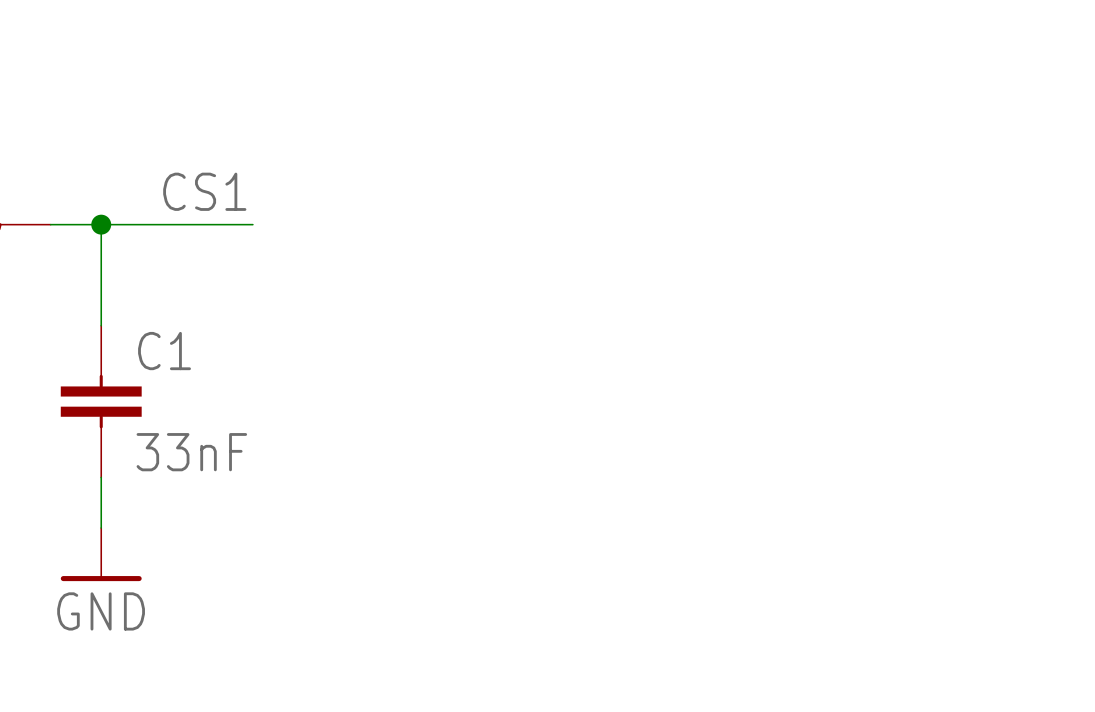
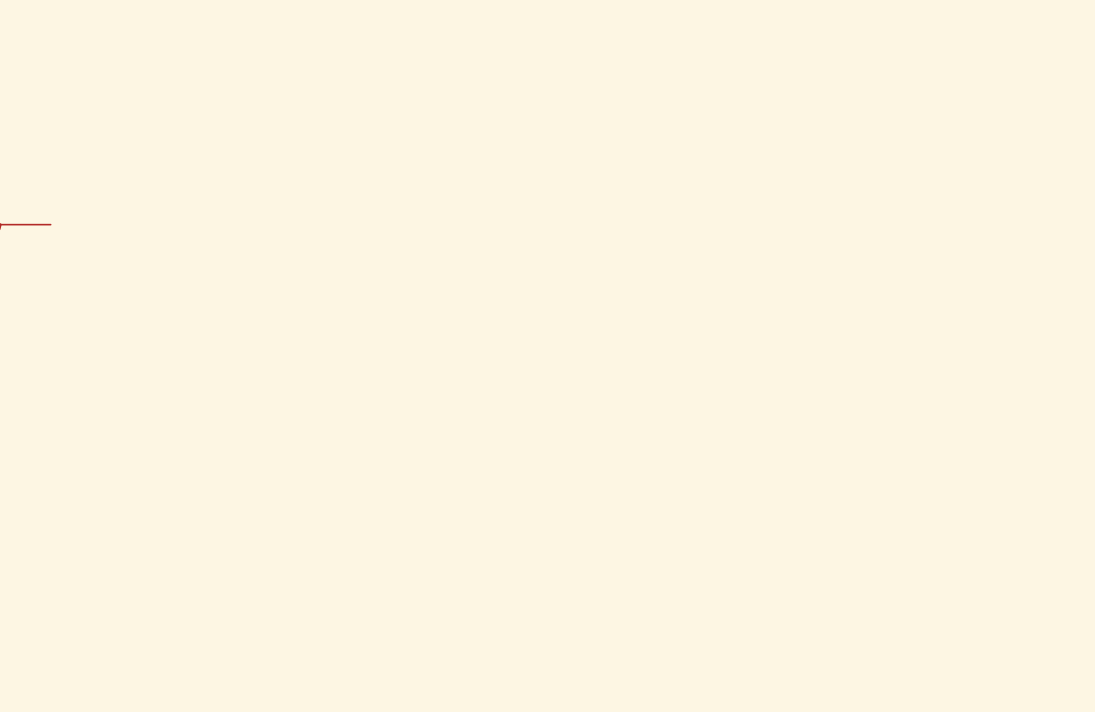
label: CS1 (204, 191) -> none
wire: (50, 224) (252, 224) -> none
wire: (101, 224) (101, 325) -> none
junction: (101, 224) -> none
C1: 33nF (101, 401) -> none
wire: (101, 477) (101, 528) -> none
power symbol: GND (101, 554) -> none

